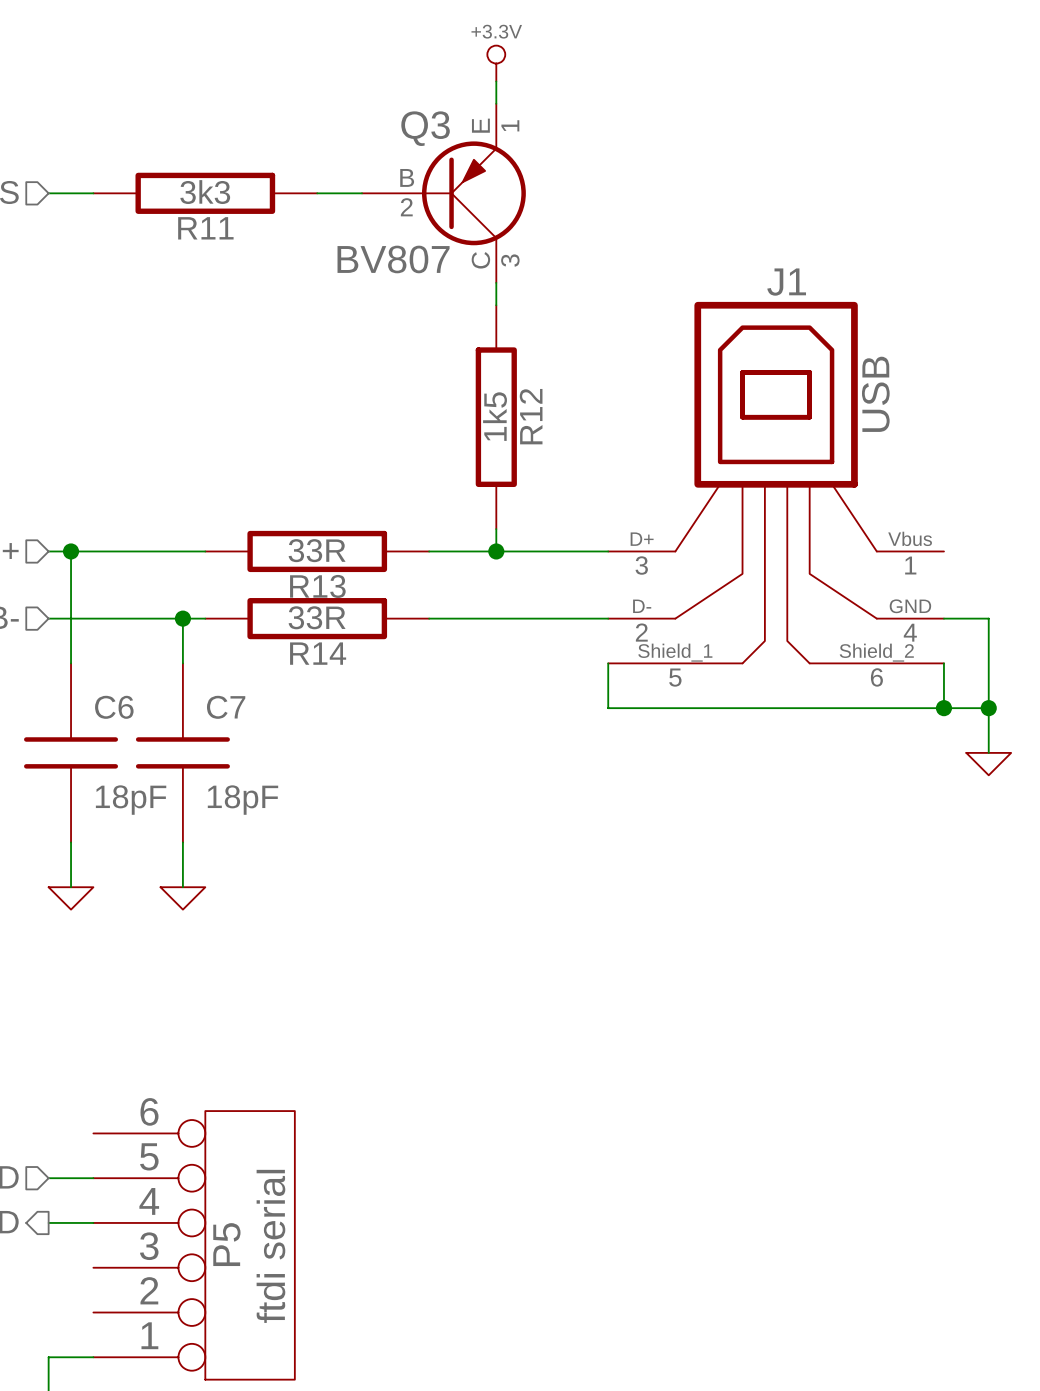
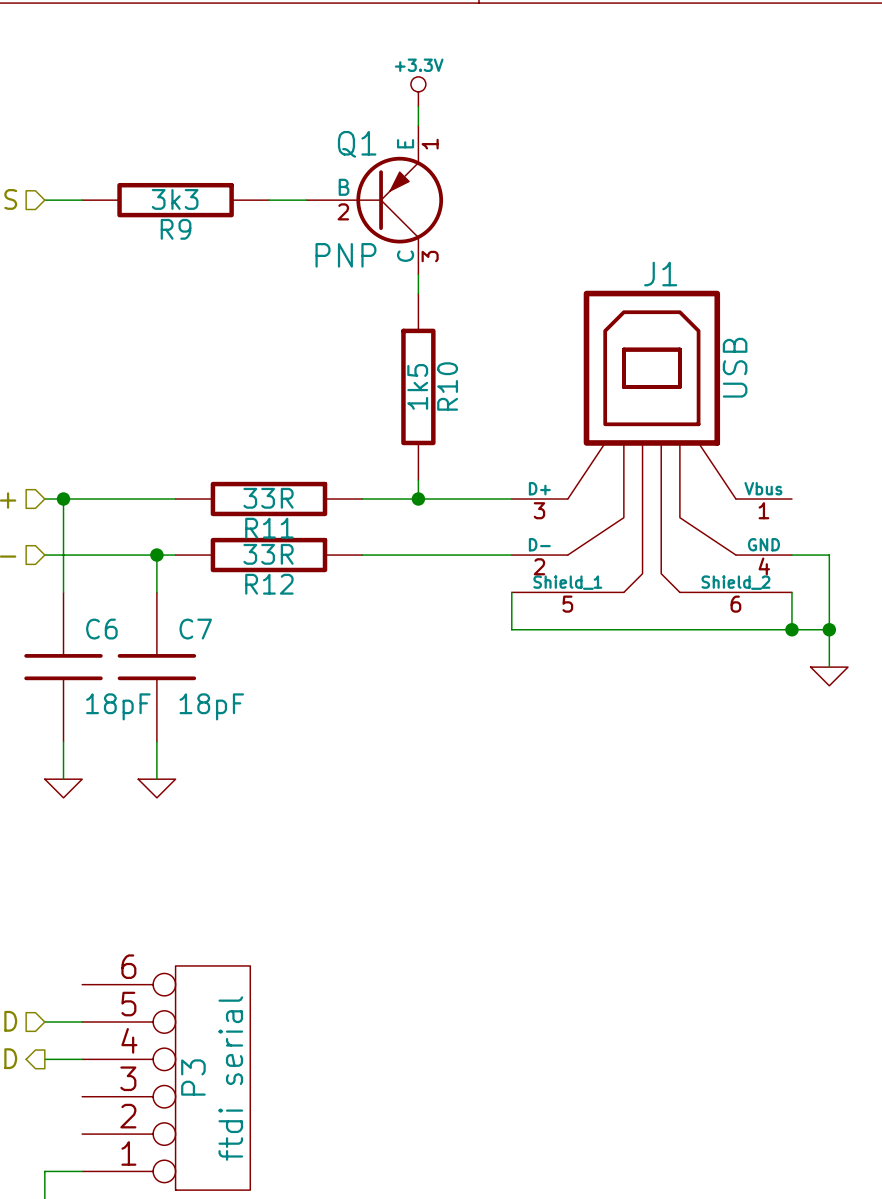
Q3 name: Q3 (425, 128) -> Q1 (357, 144)
R11 name: R11 (205, 228) -> R9 (176, 229)
Q3 value: BV807 (393, 259) -> PNP (345, 255)
R12 name: R12 (531, 416) -> R10 (447, 386)
R13 name: R13 (317, 586) -> R11 (269, 528)
R14 name: R14 (318, 653) -> R12 (269, 584)
P5 name: P5 (226, 1244) -> P3 (193, 1077)

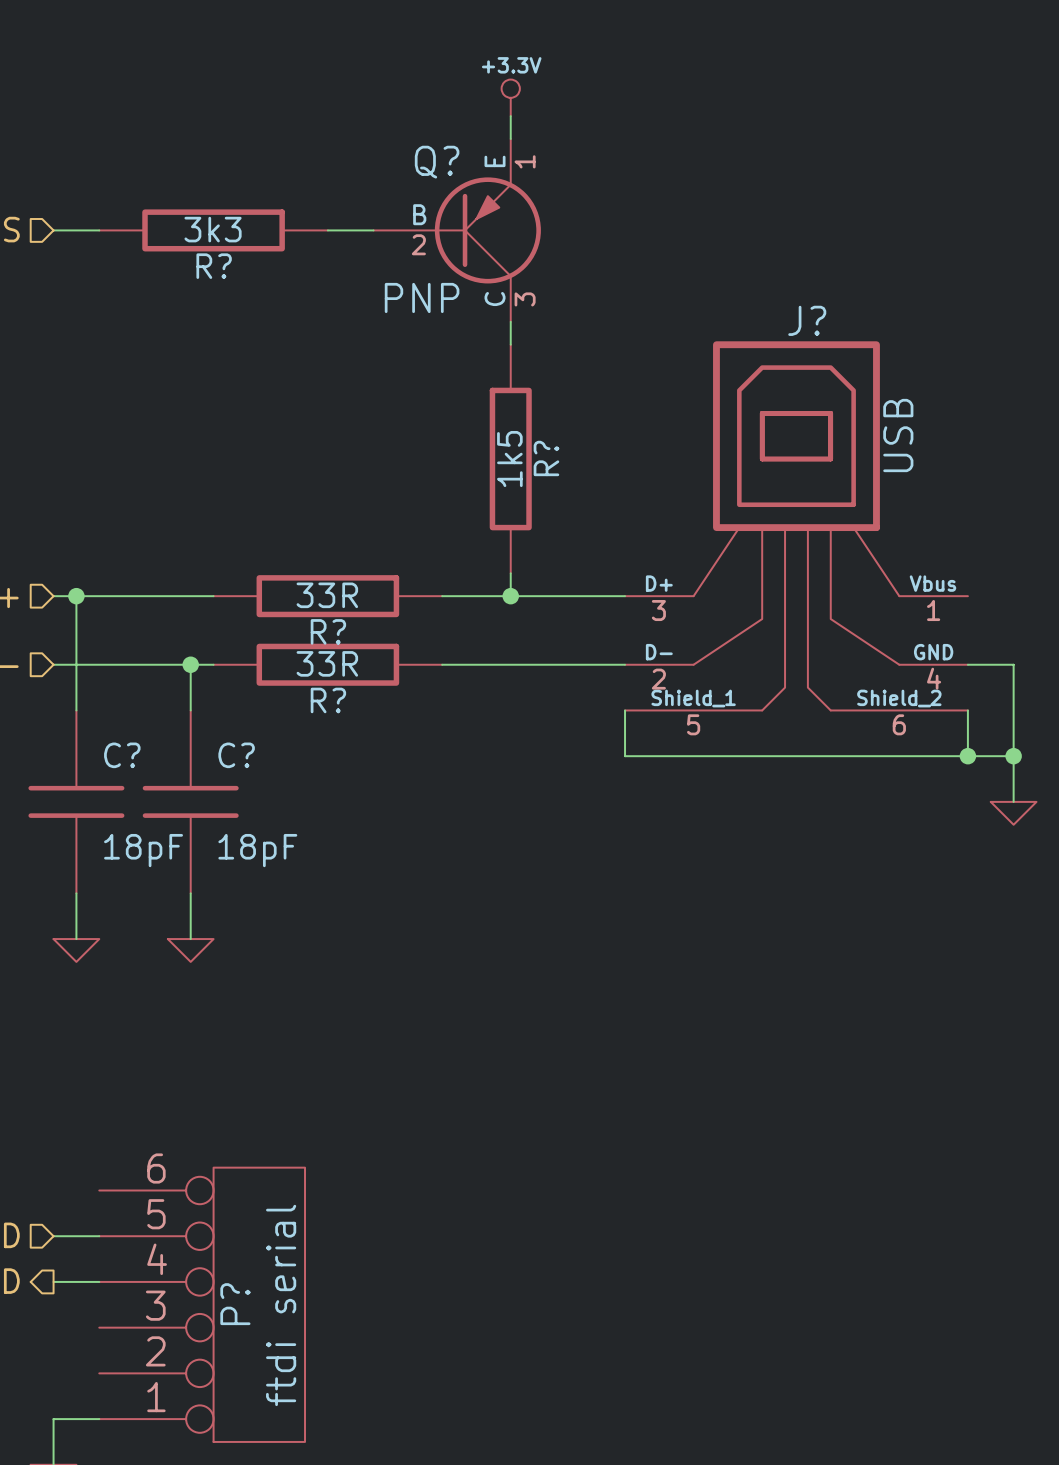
Q1 name: Q1 (357, 144) -> Q? (437, 162)
R9 name: R9 (176, 229) -> R? (214, 266)
J1 name: J1 (660, 274) -> J? (807, 320)
R10 name: R10 (447, 386) -> R? (546, 458)
R11 name: R11 (269, 528) -> R? (328, 631)
R12 name: R12 (269, 584) -> R? (328, 700)
C6 name: C6 (101, 629) -> C? (122, 755)
C7 name: C7 (195, 629) -> C? (236, 755)
P3 name: P3 (193, 1077) -> P? (235, 1304)

